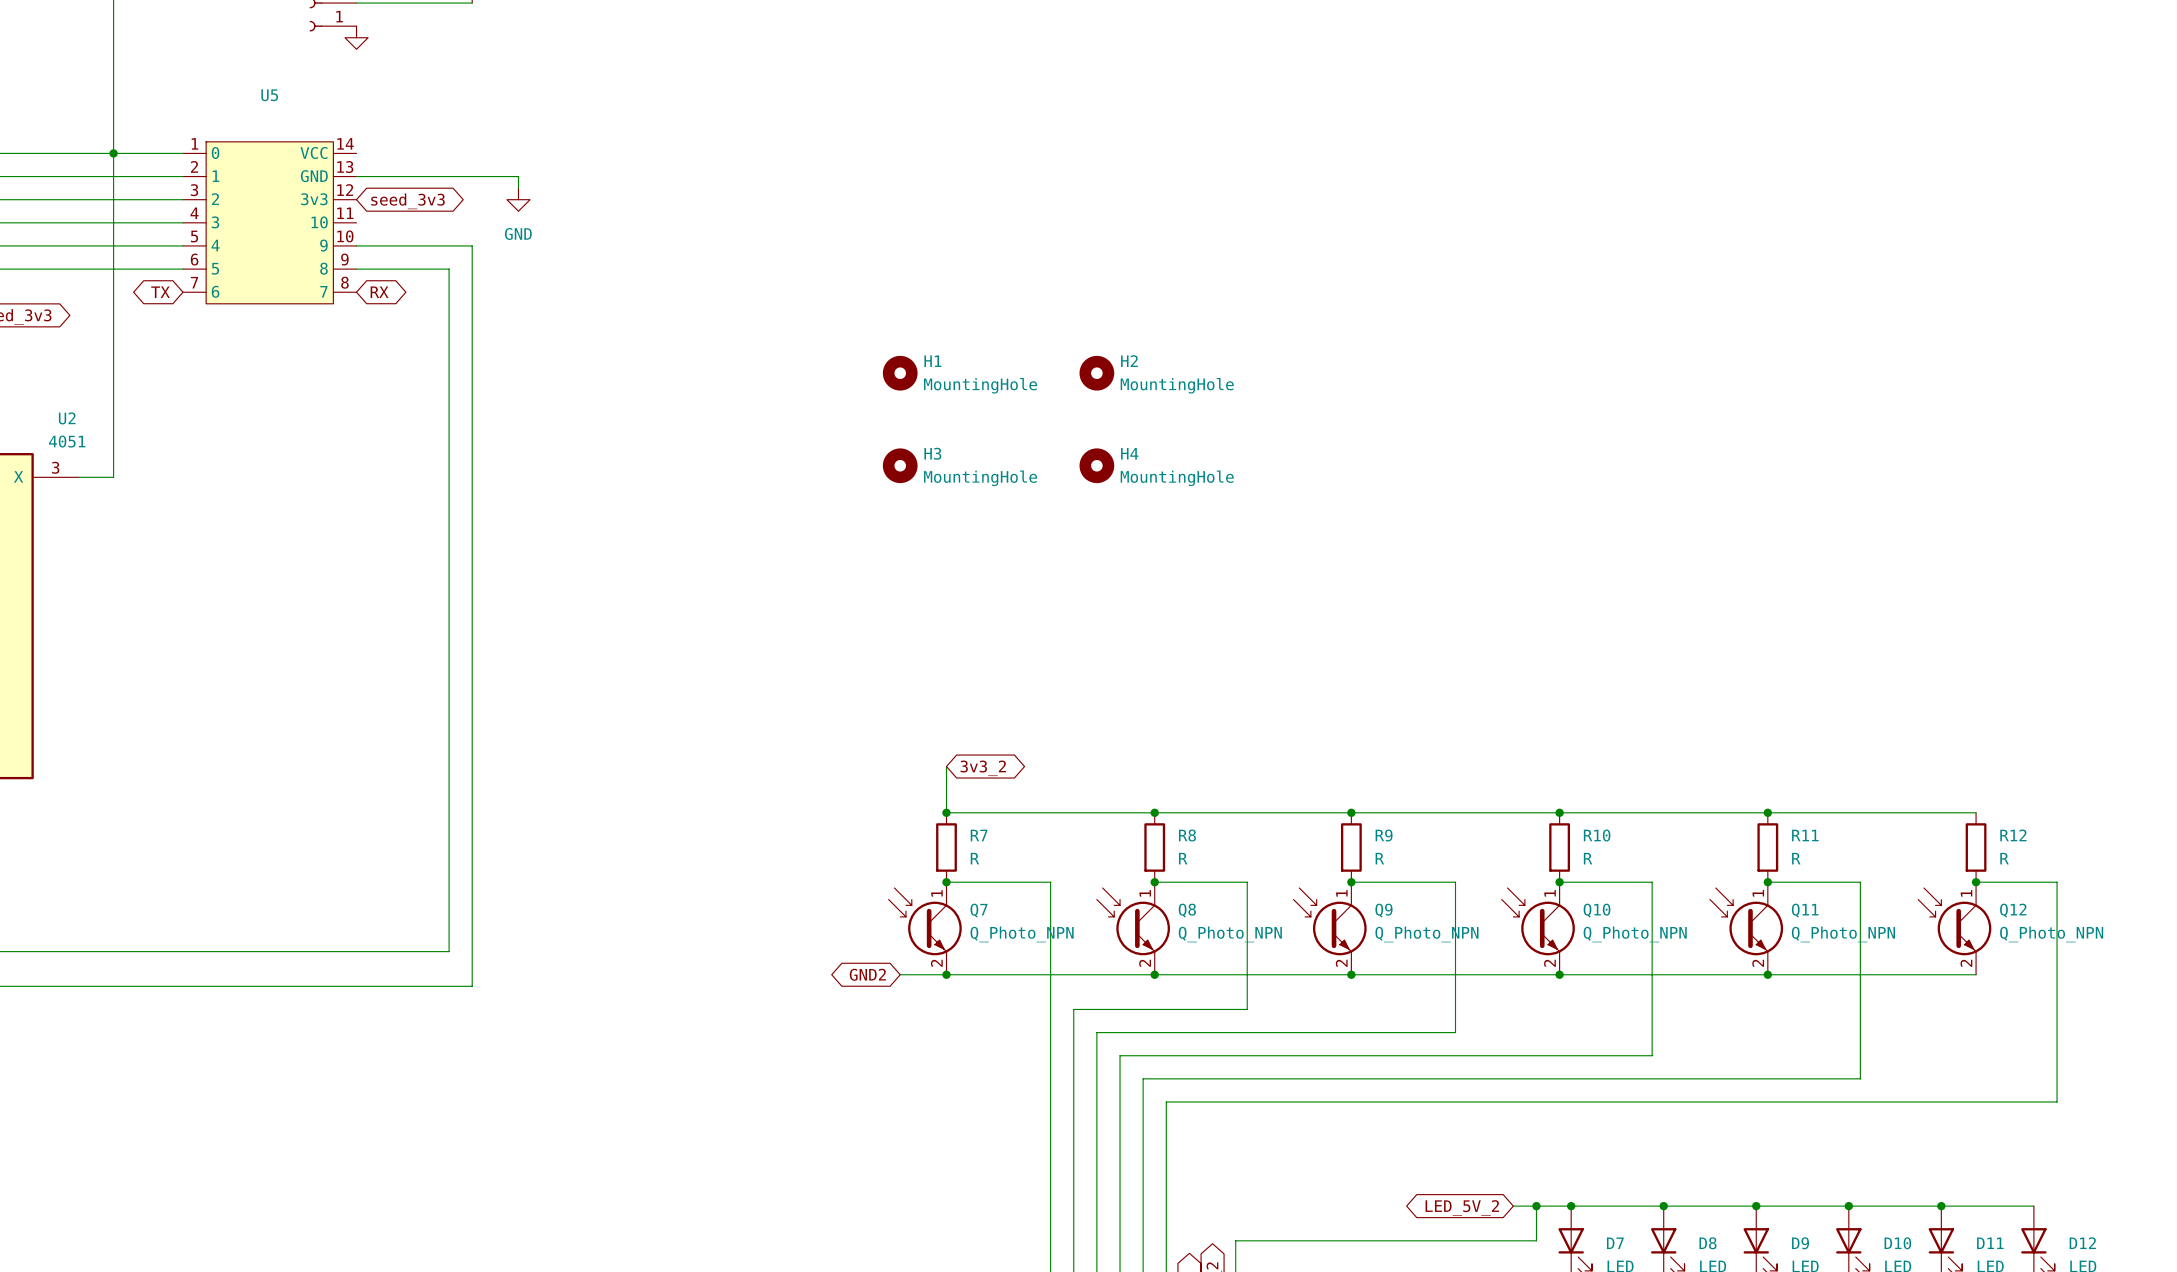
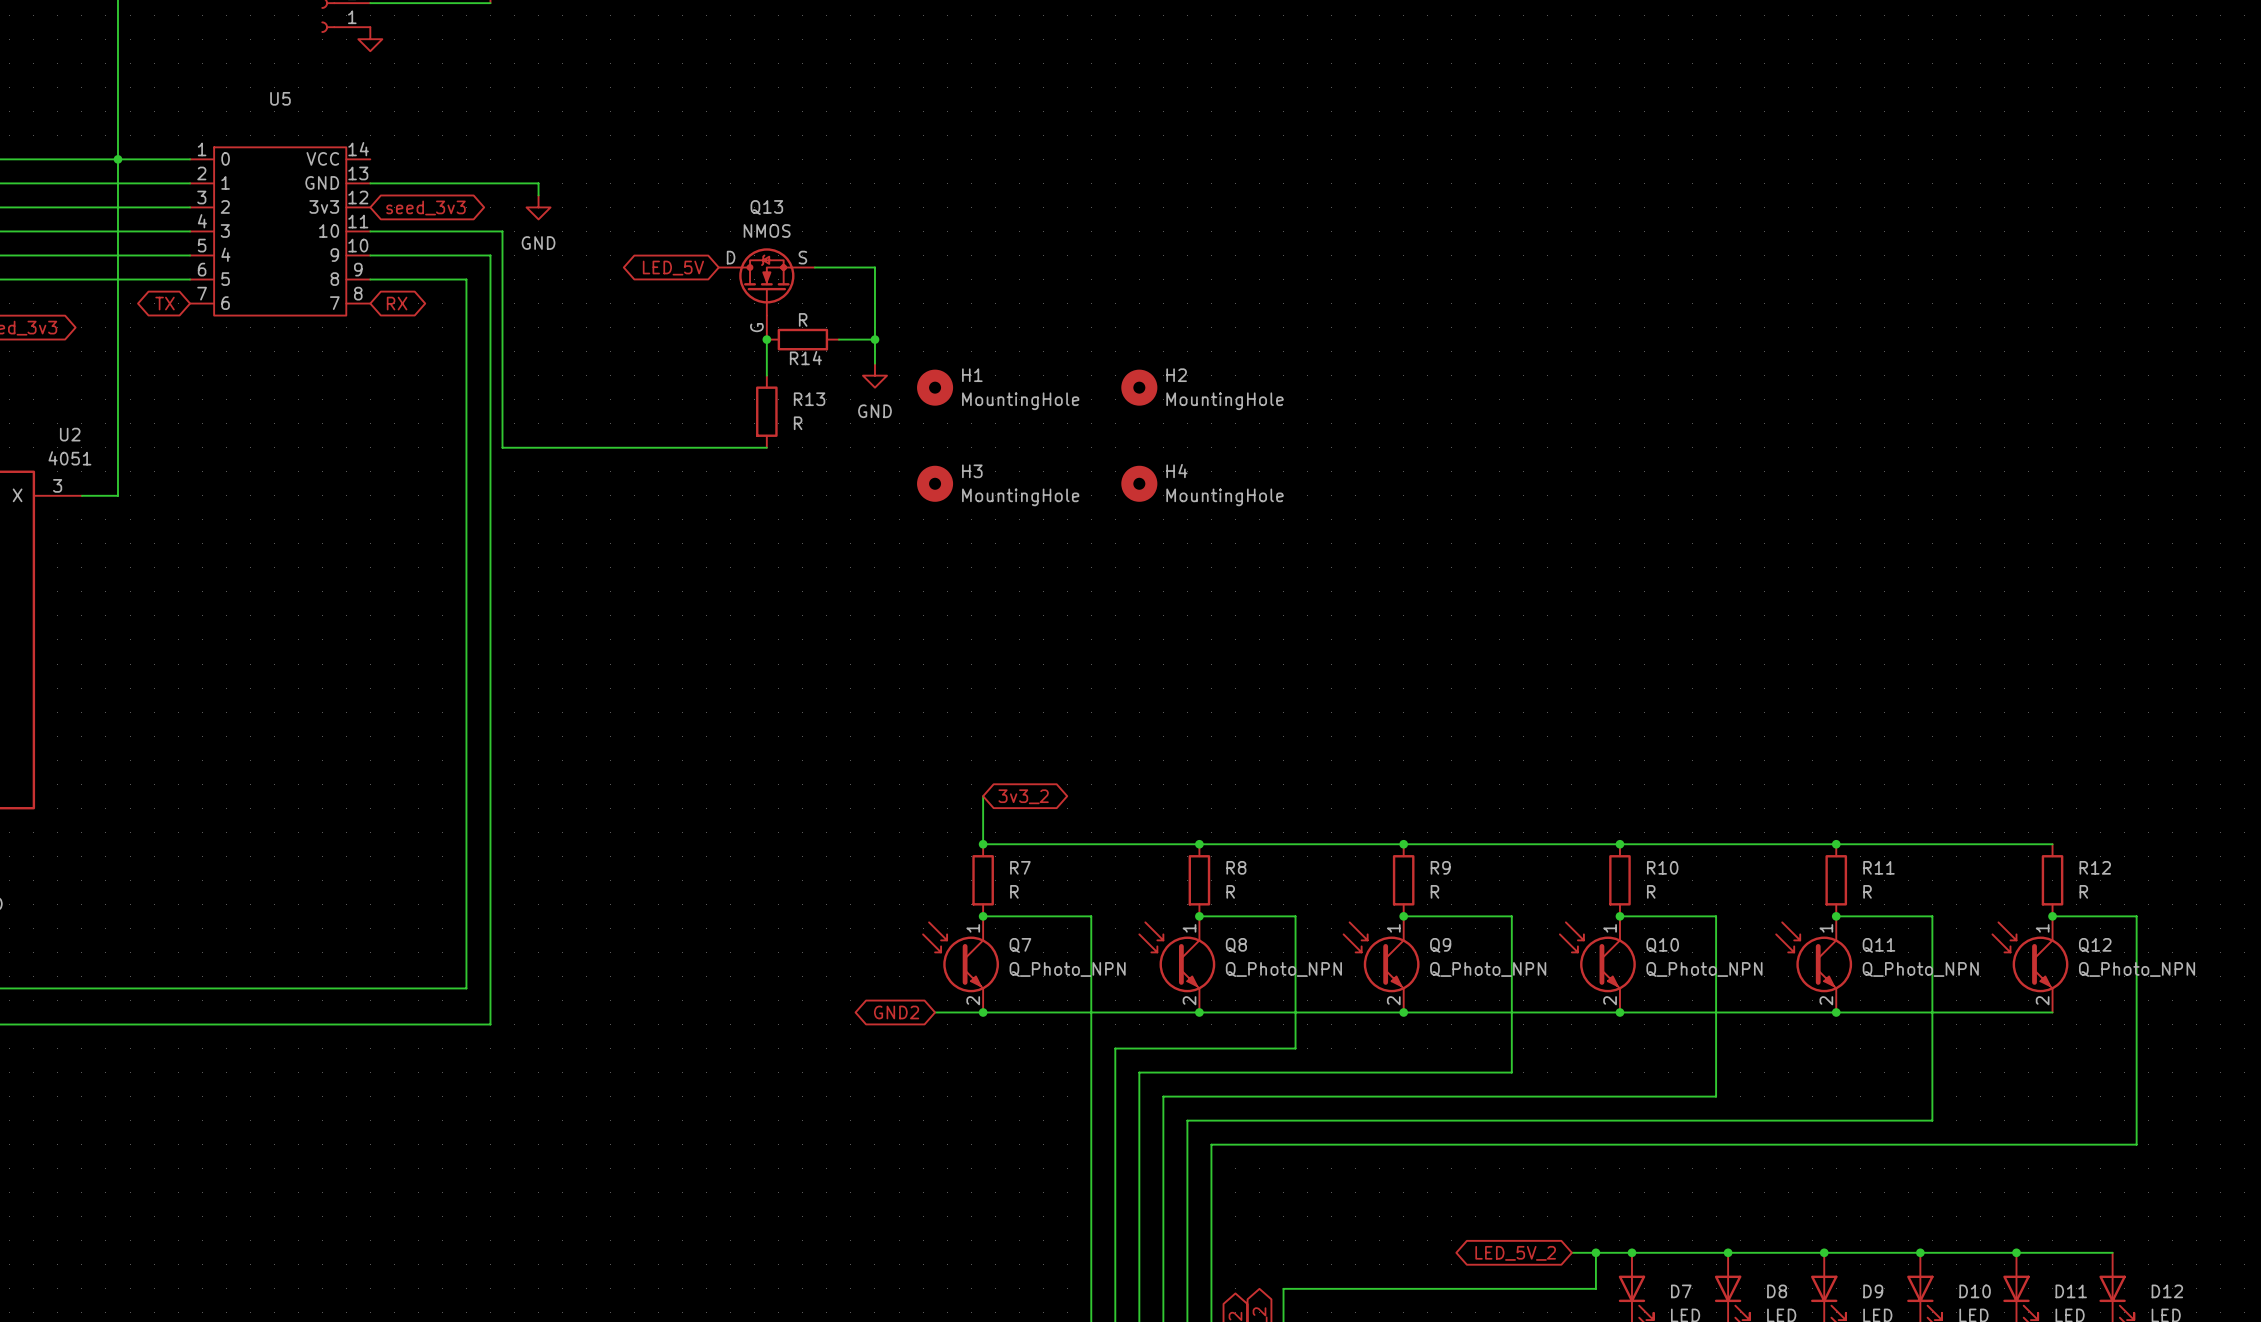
wire: none -> (370, 231) (502, 231) (502, 447) (766, 447)
wire: none -> (814, 267) (874, 267) (874, 363)
global label: none -> LED_5V (673, 268)
Q13: none -> NMOS (766, 293)
wire: none -> (766, 339) (766, 375)
junction: none -> (766, 339)
R14: none -> R (802, 339)
wire: none -> (838, 339) (874, 339)
junction: none -> (874, 339)
power symbol: none -> GND (874, 375)
R13: none -> R (766, 411)

